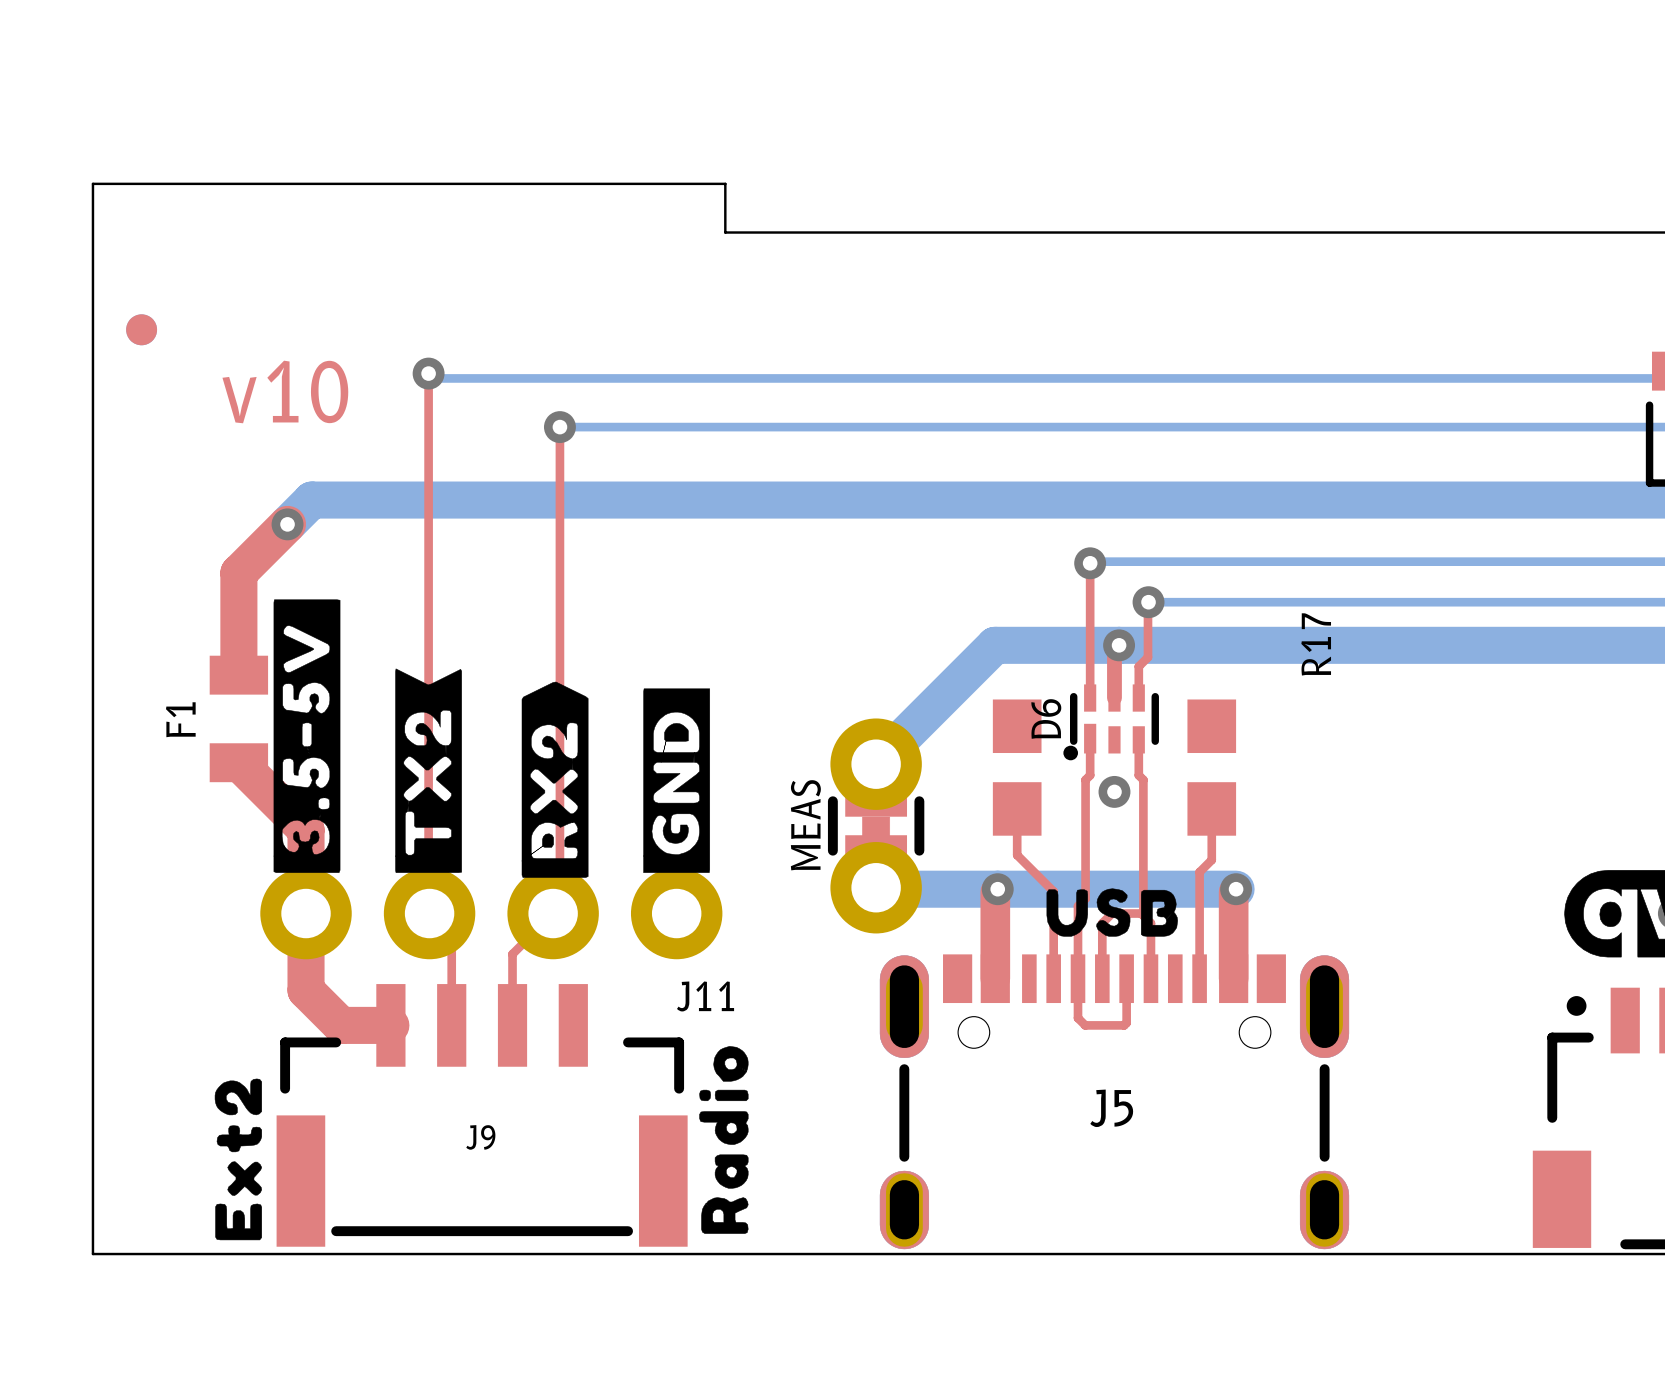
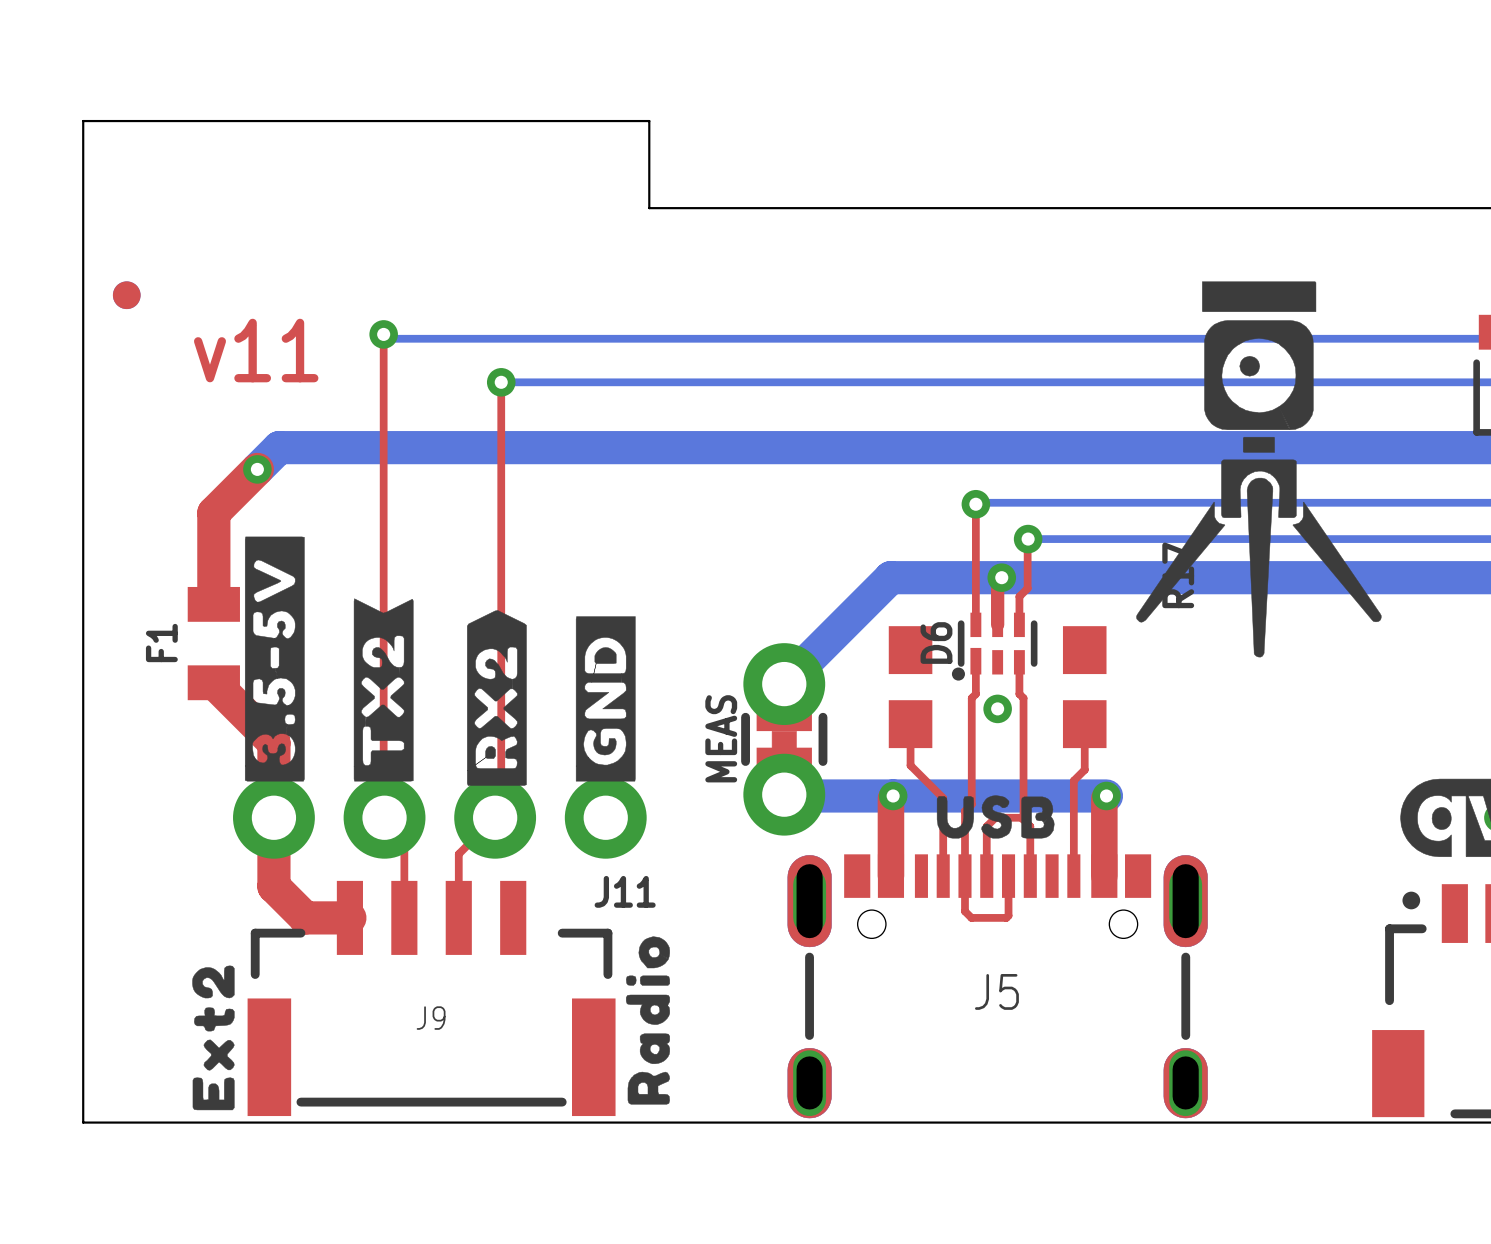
board edge: (92, 183) (725, 183) -> (83, 164) (83, 121) (649, 121) (649, 164)
drawing: none -> [1136, 281, 1382, 658]
text: v10 (285, 391) -> v11 (256, 350)

